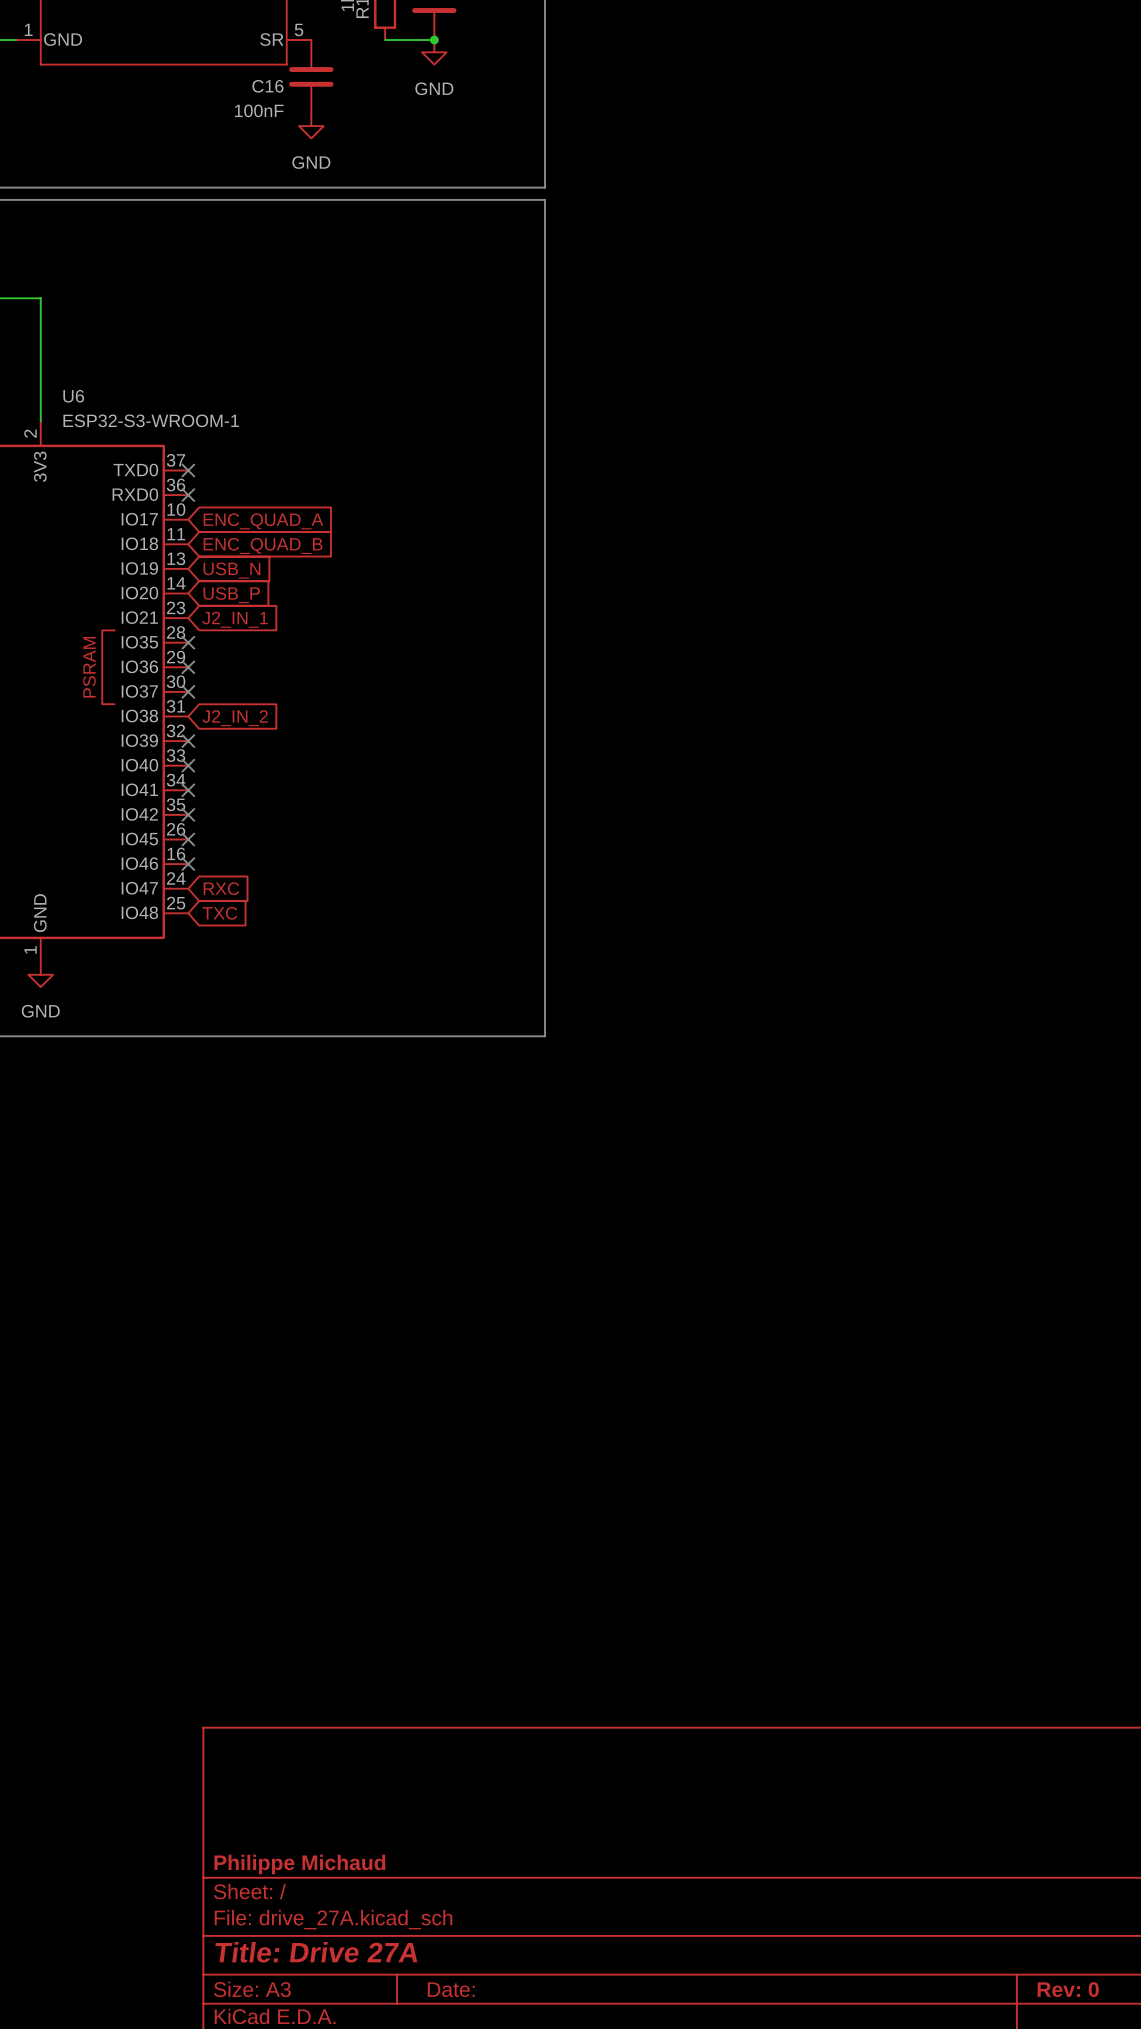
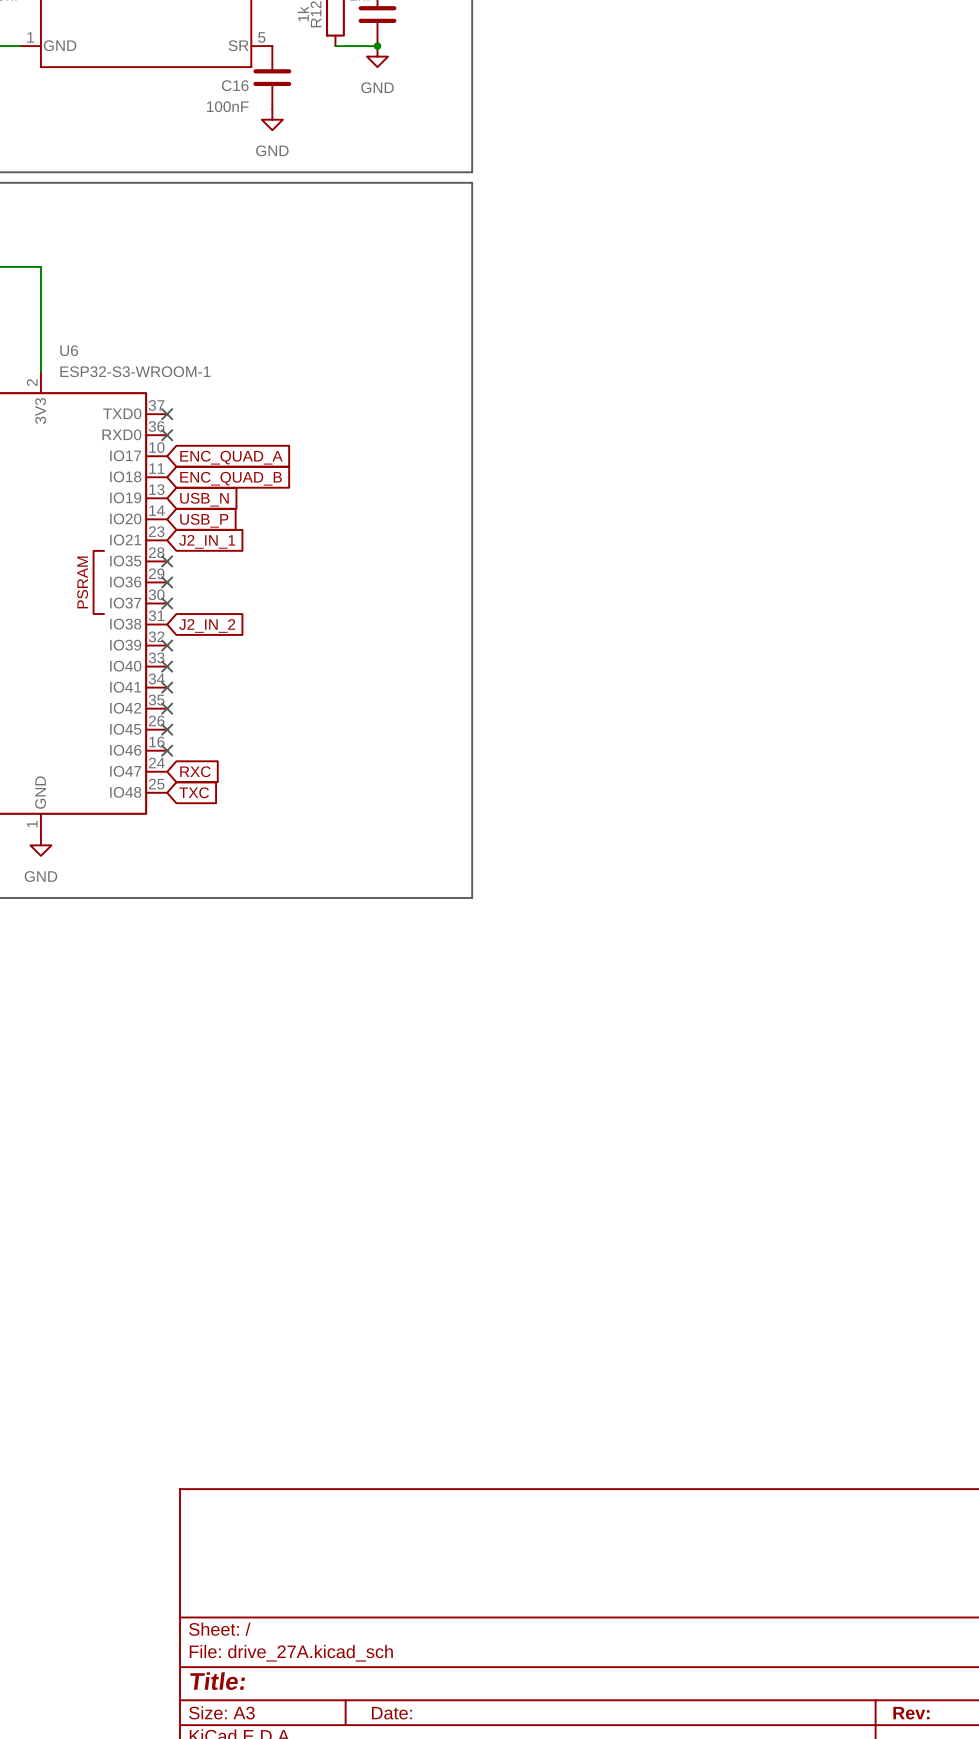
title block: Philippe Michaud (299, 1864) -> none
title block: Title: Drive 27A (316, 1952) -> Title: (217, 1681)
title block: Rev: 0 (1068, 1989) -> Rev: (911, 1713)

